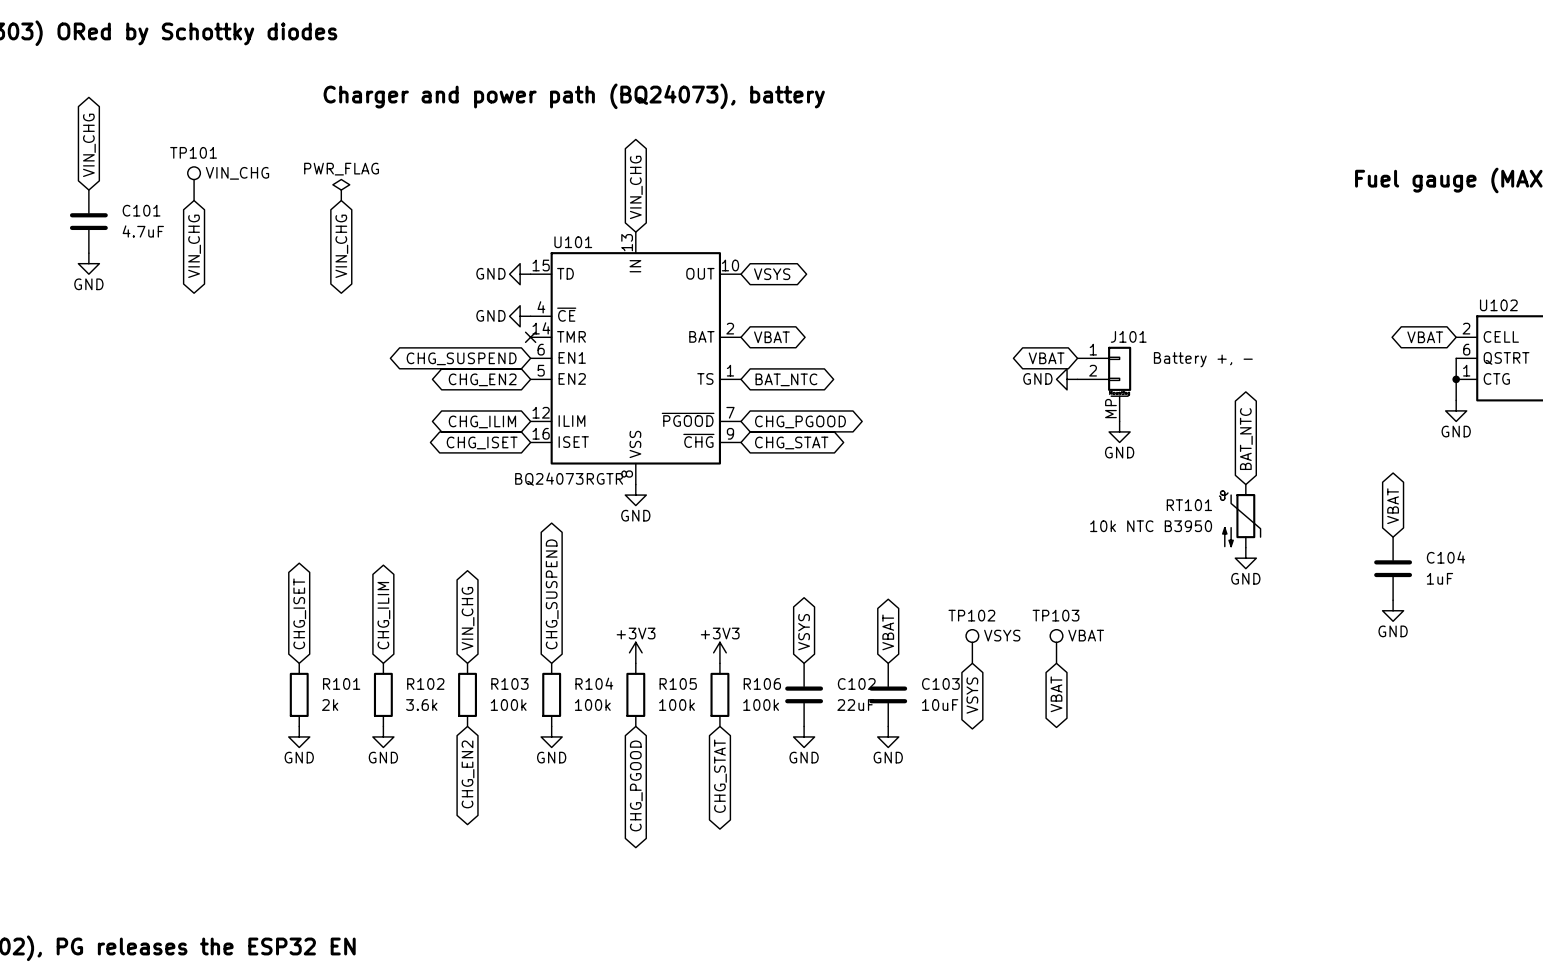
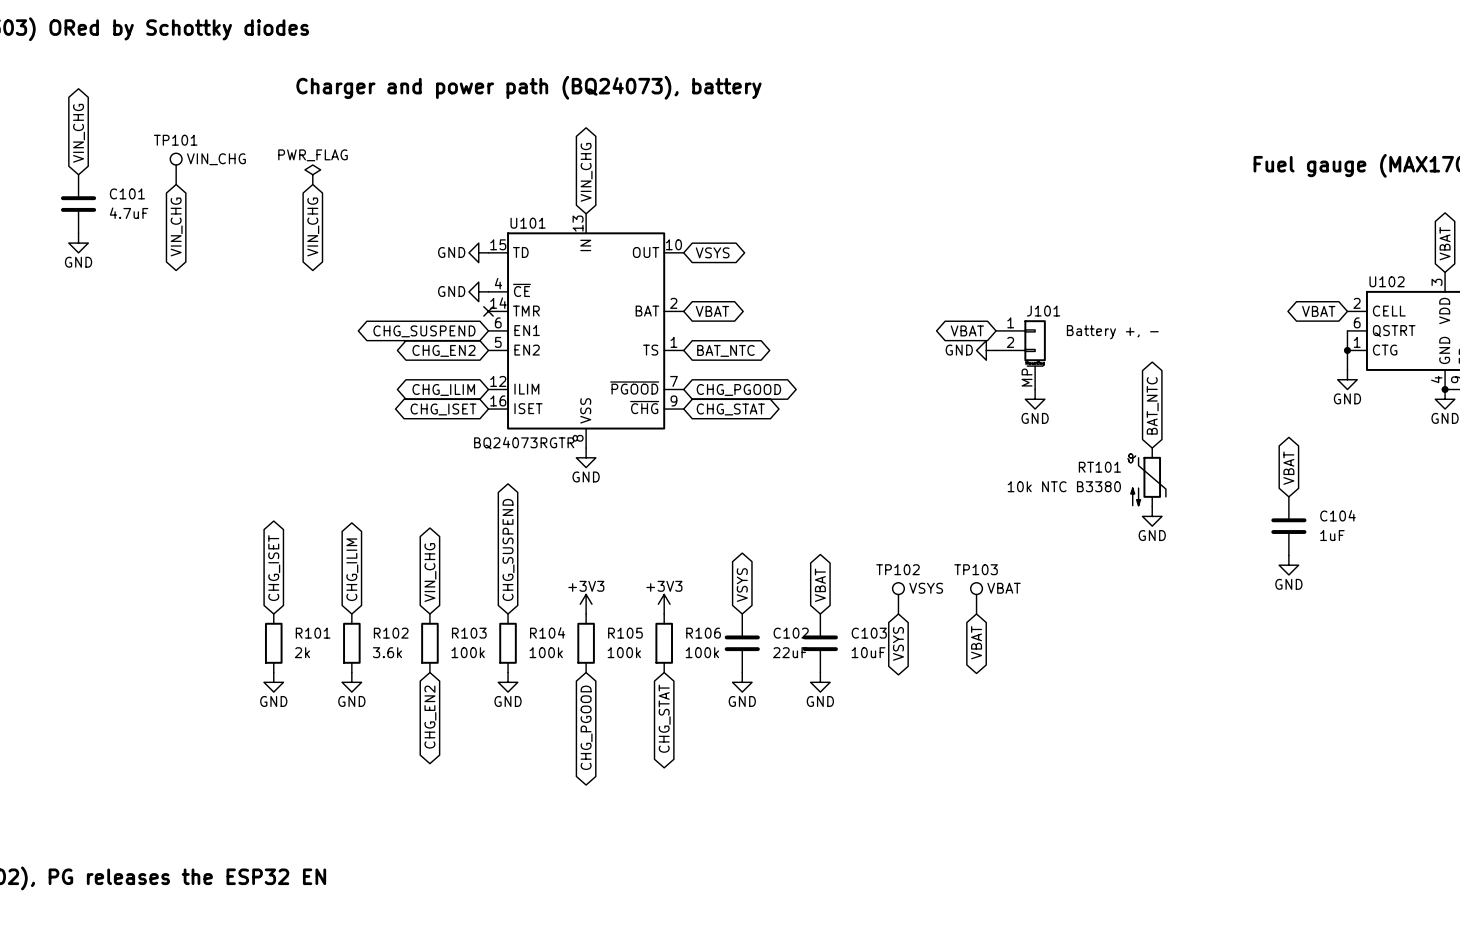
RT101 value: 10k NTC B3950 (1151, 526) -> 10k NTC B3380 (1064, 486)

